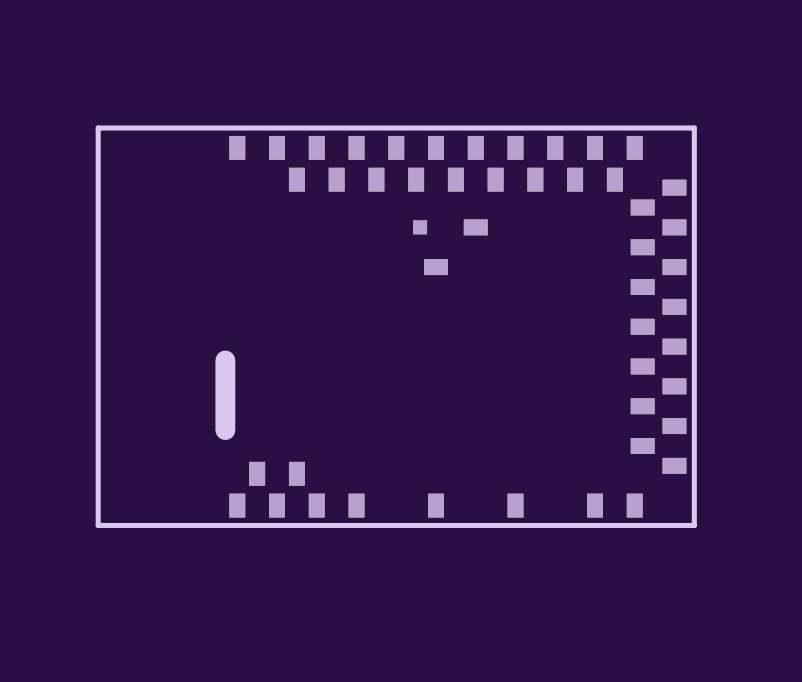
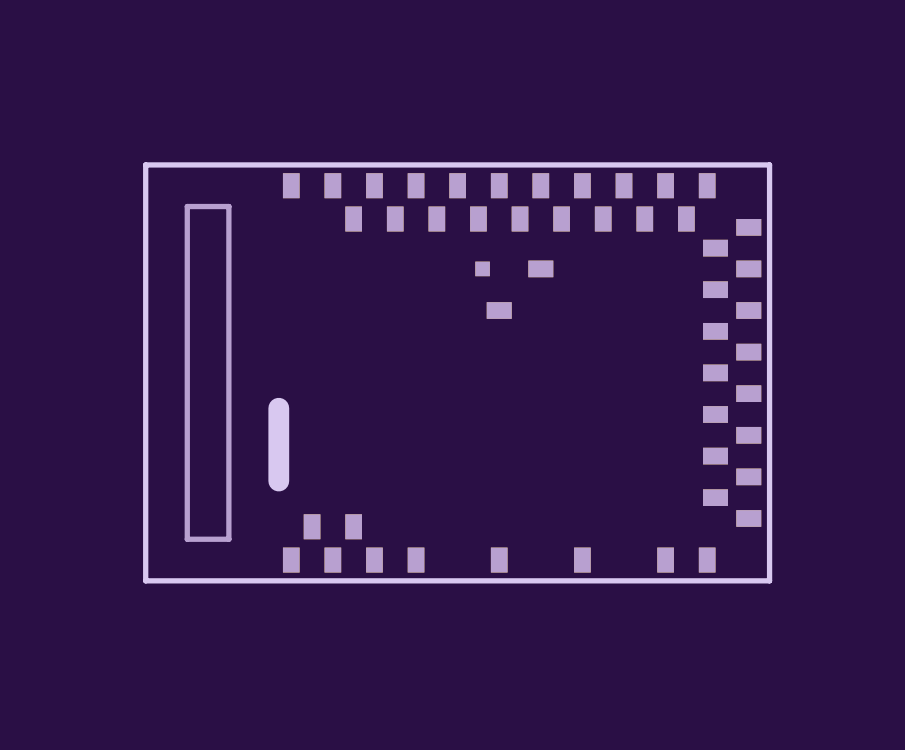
line: none -> (228, 206) (187, 206) (187, 539) (228, 539) (228, 206)

